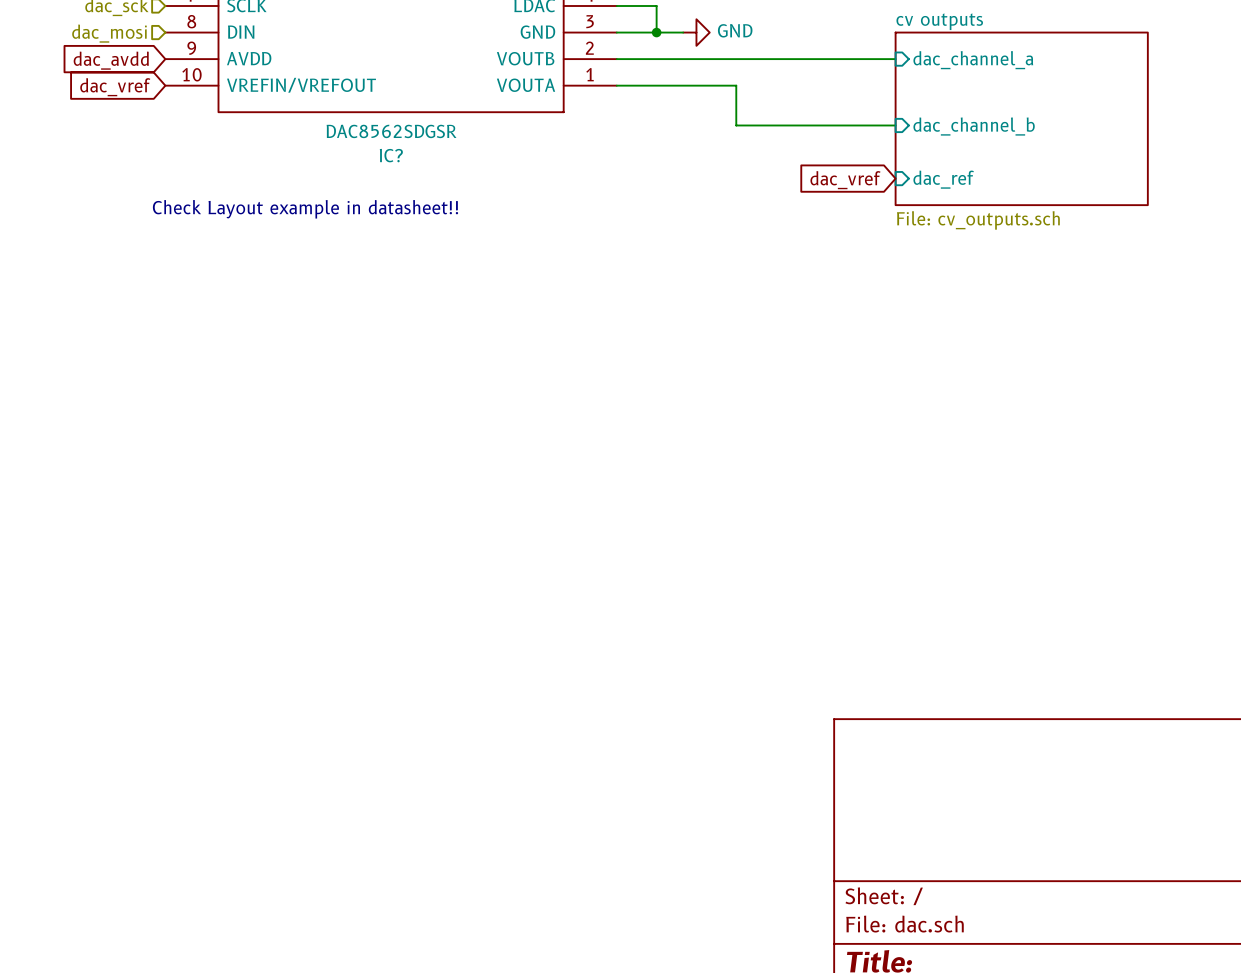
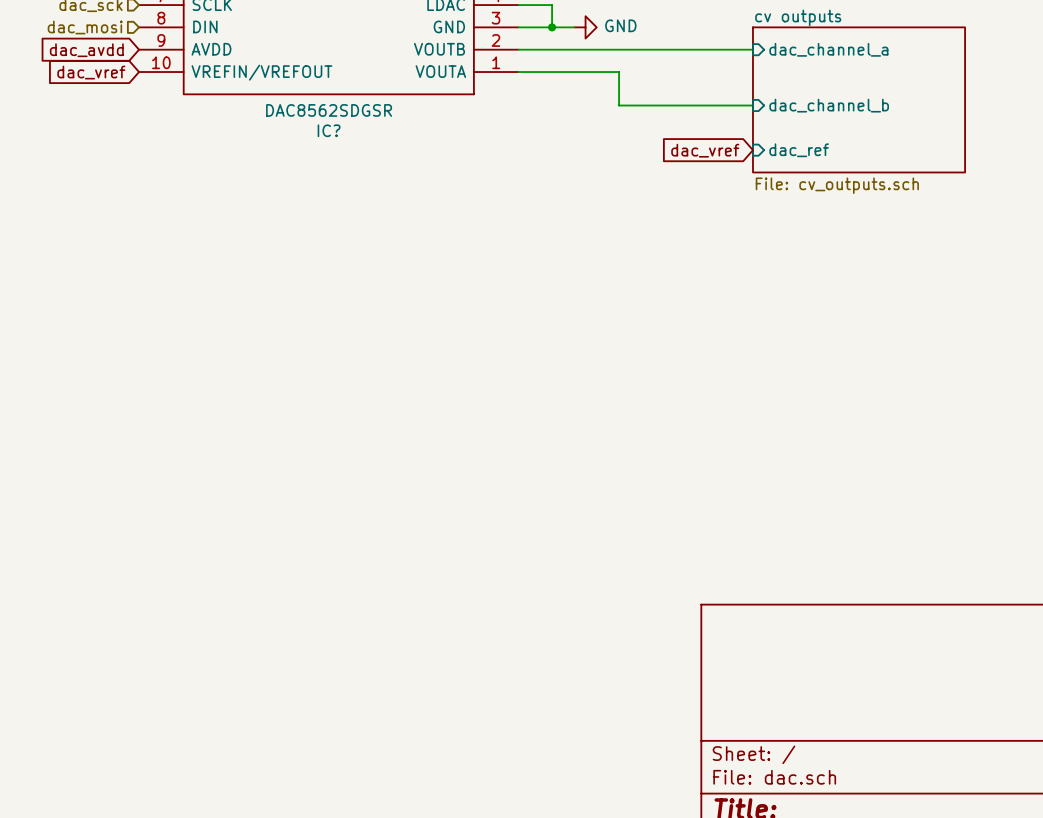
text: Check Layout example in datasheet!! (305, 209) -> none

